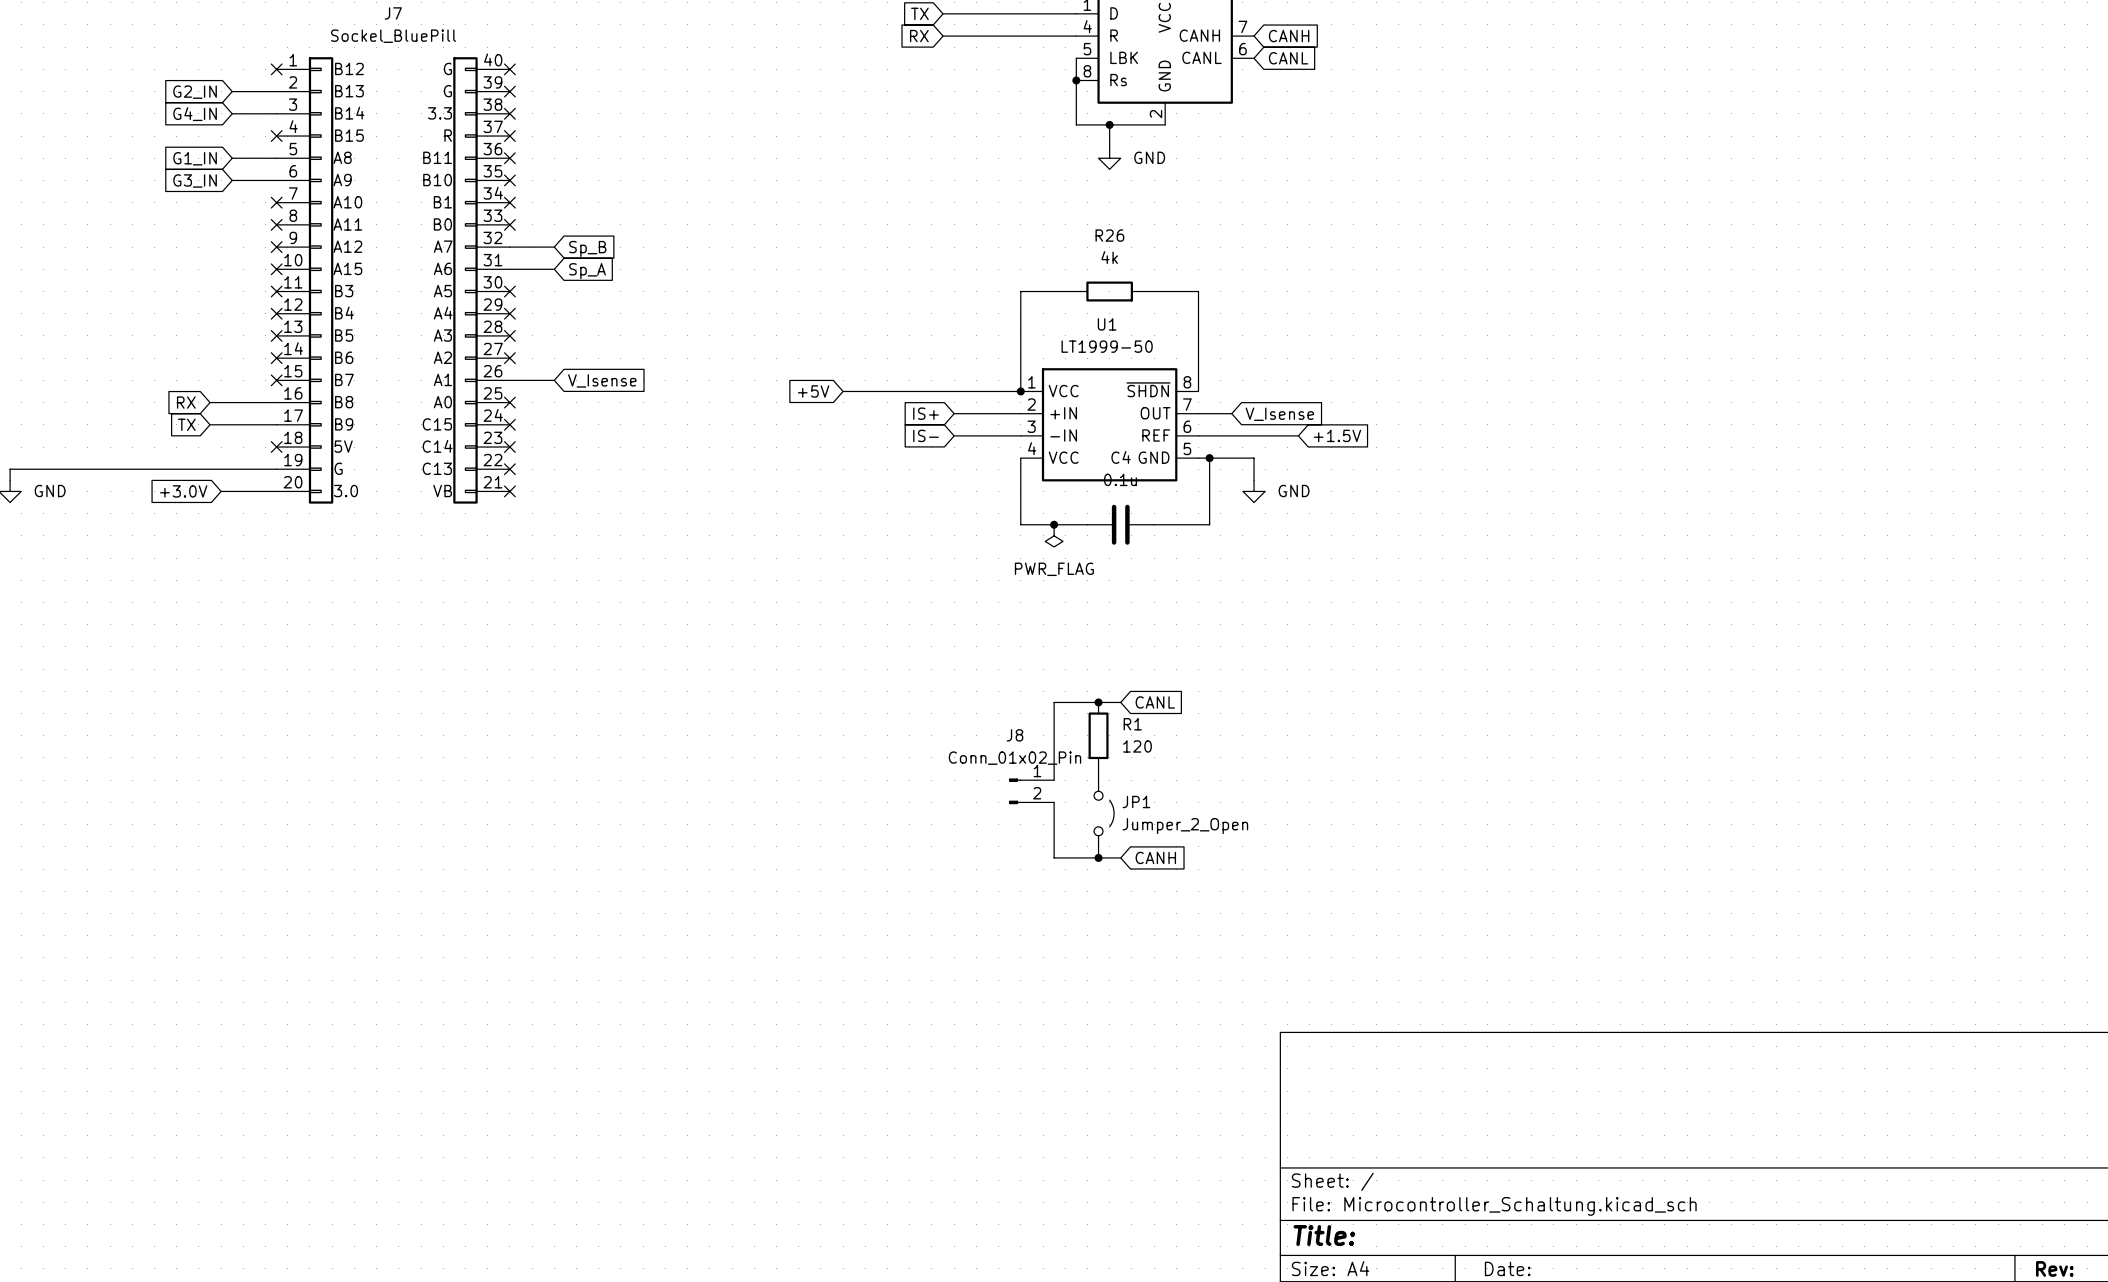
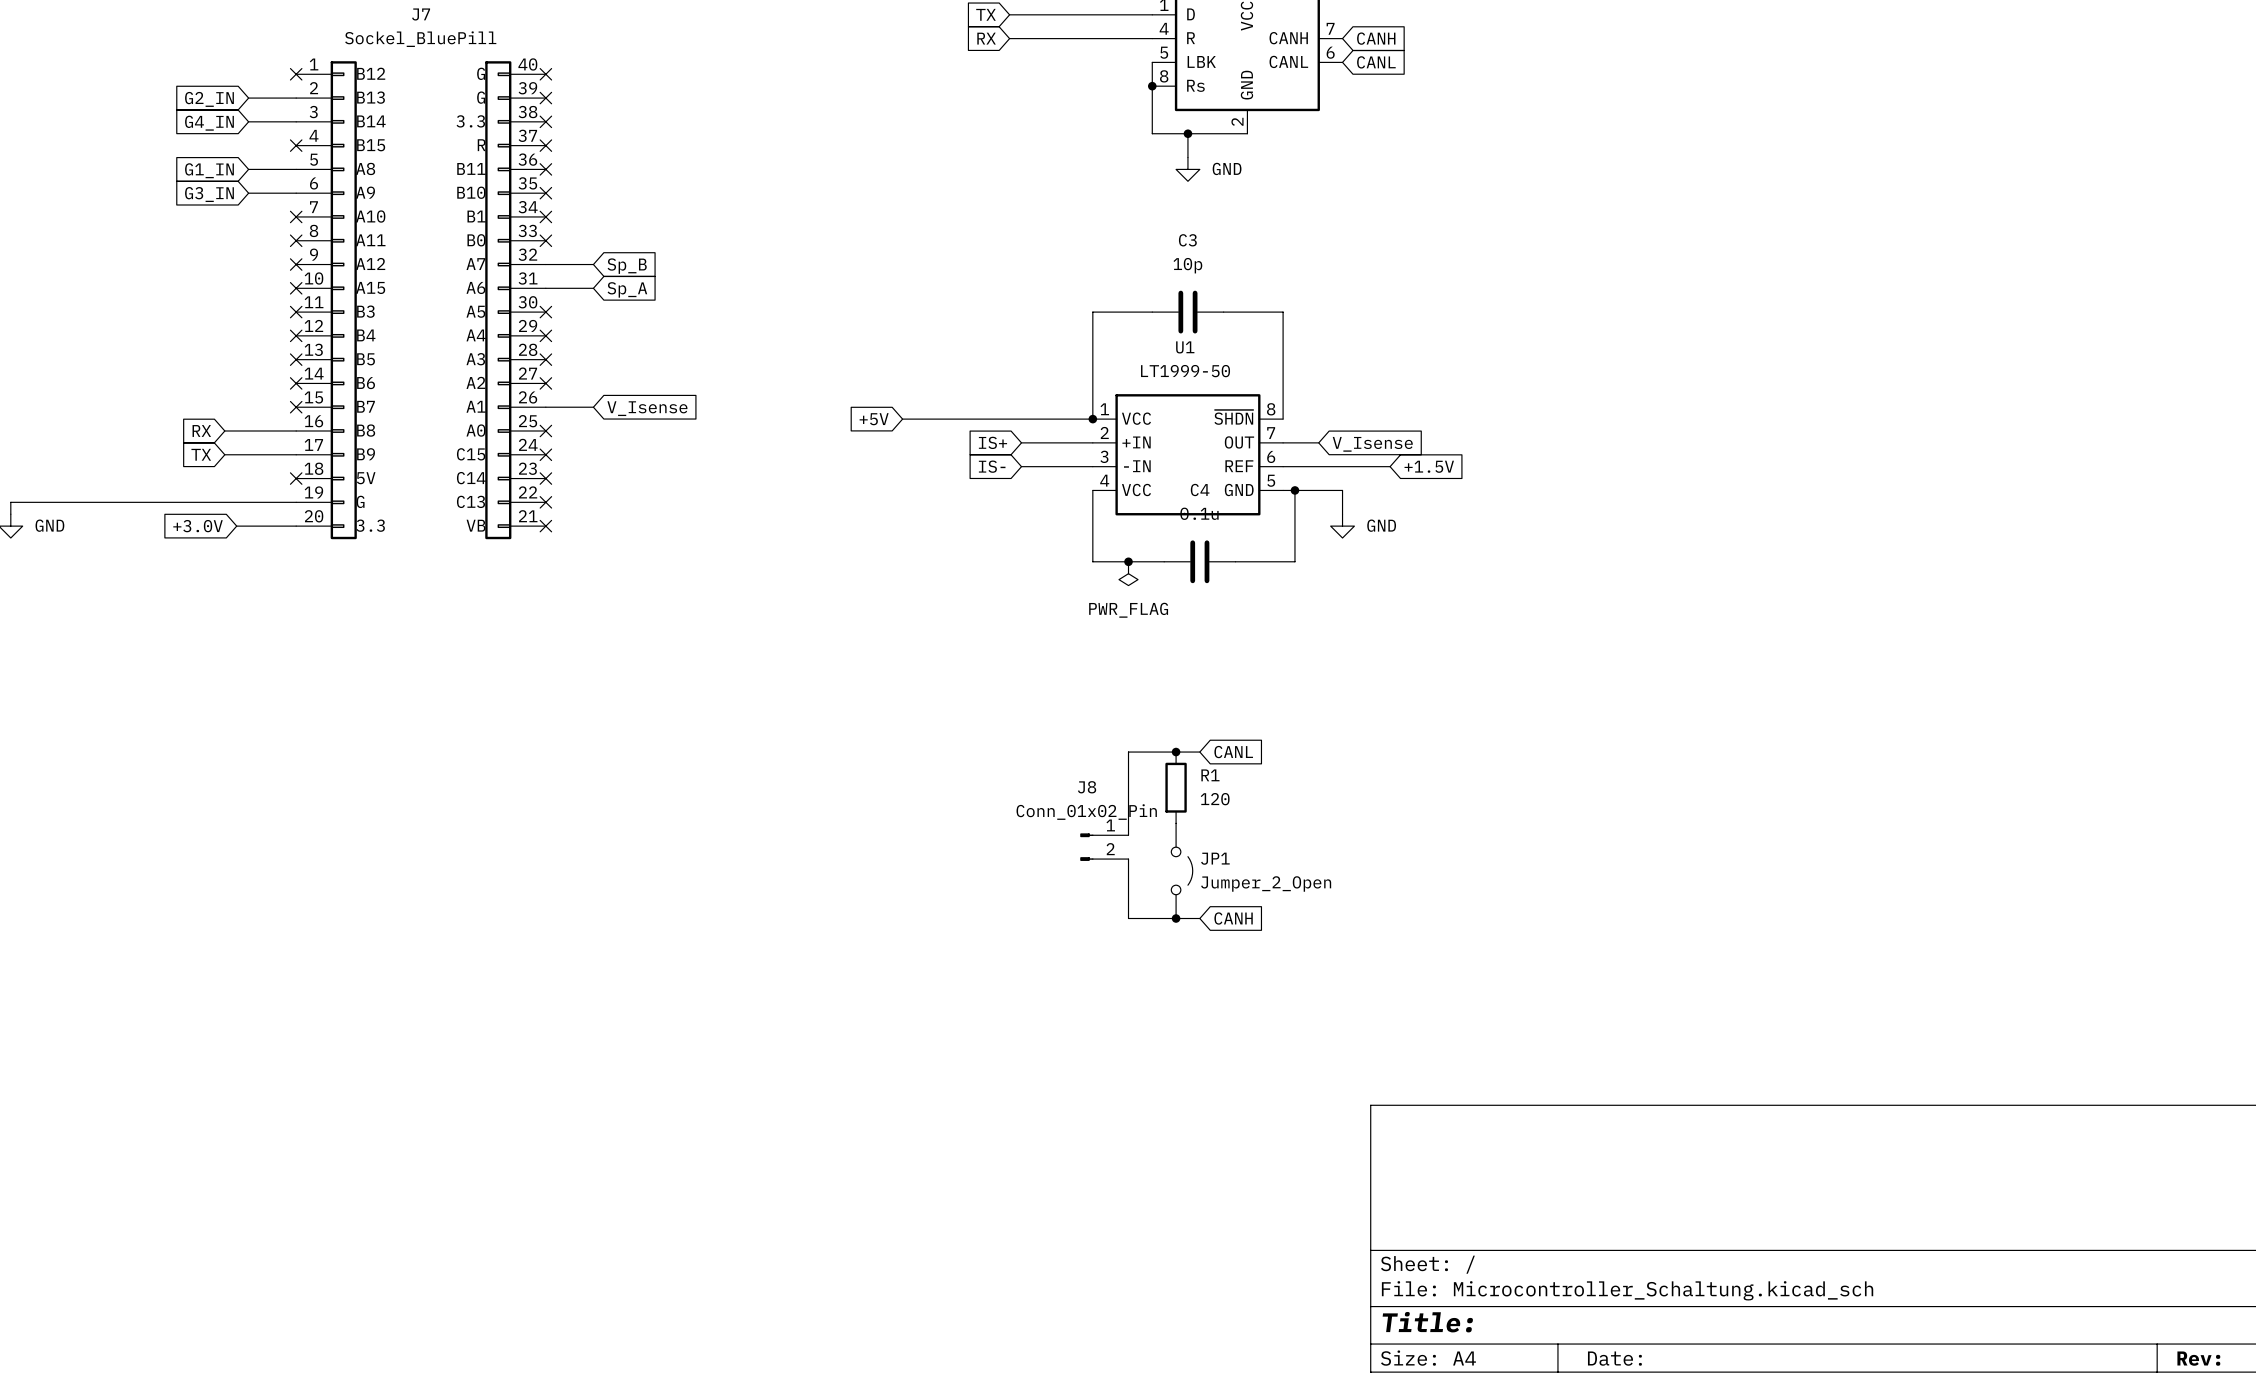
R26: 4k (1109, 291) -> none
C3: none -> 10p (1187, 312)
J7 pin name: 3.0 (346, 491) -> 3.3 (370, 525)

